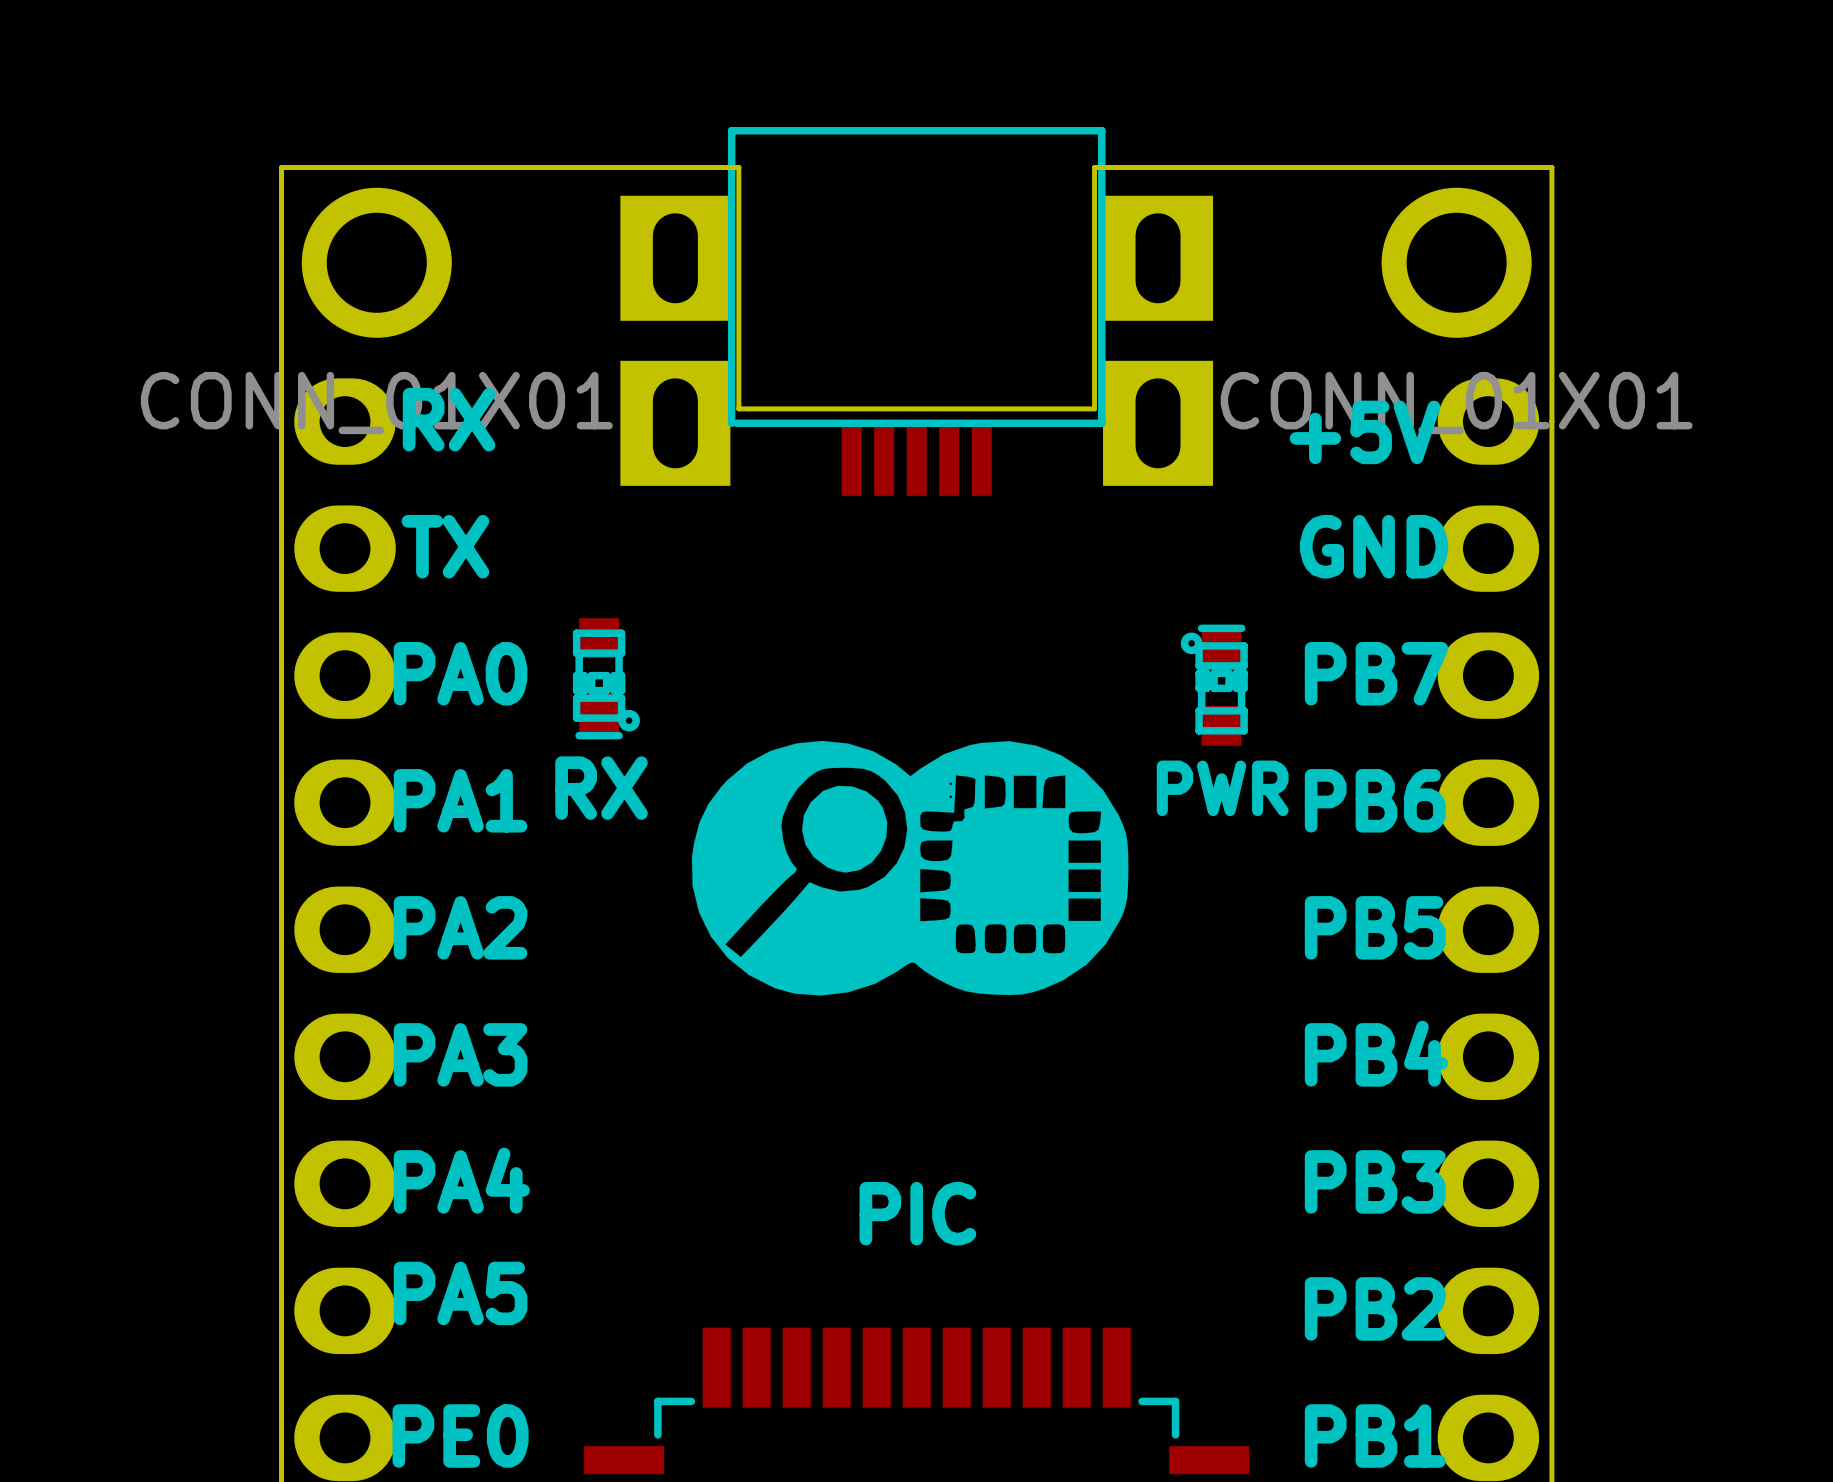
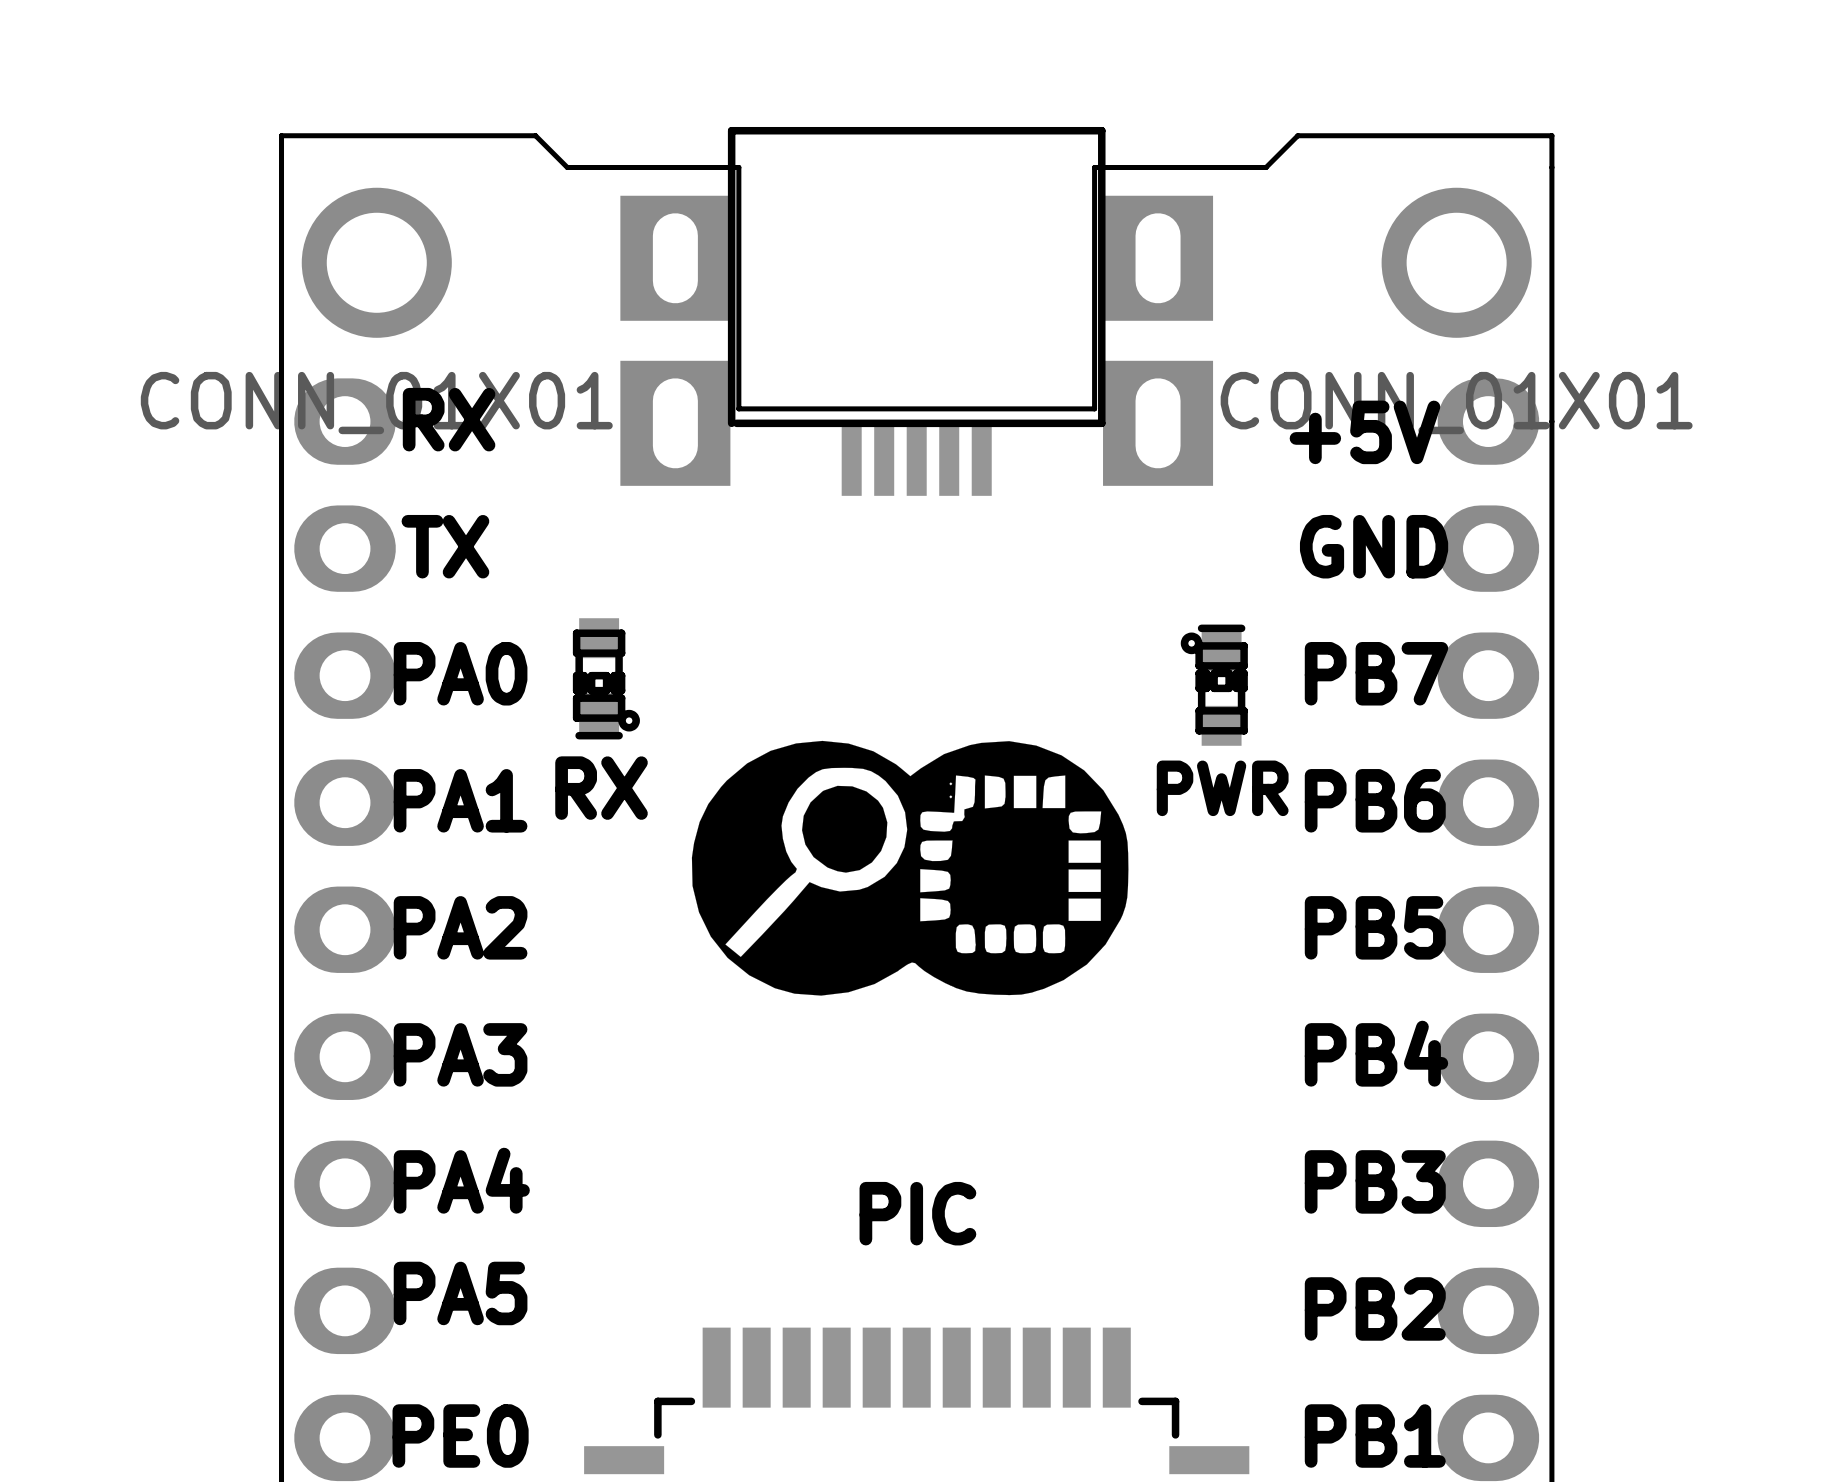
board edge: (281, 167) (567, 167) -> (281, 167) (281, 135) (535, 135) (567, 167)
board edge: (1266, 167) (1551, 167) -> (1266, 167) (1297, 135) (1551, 135) (1551, 167)

